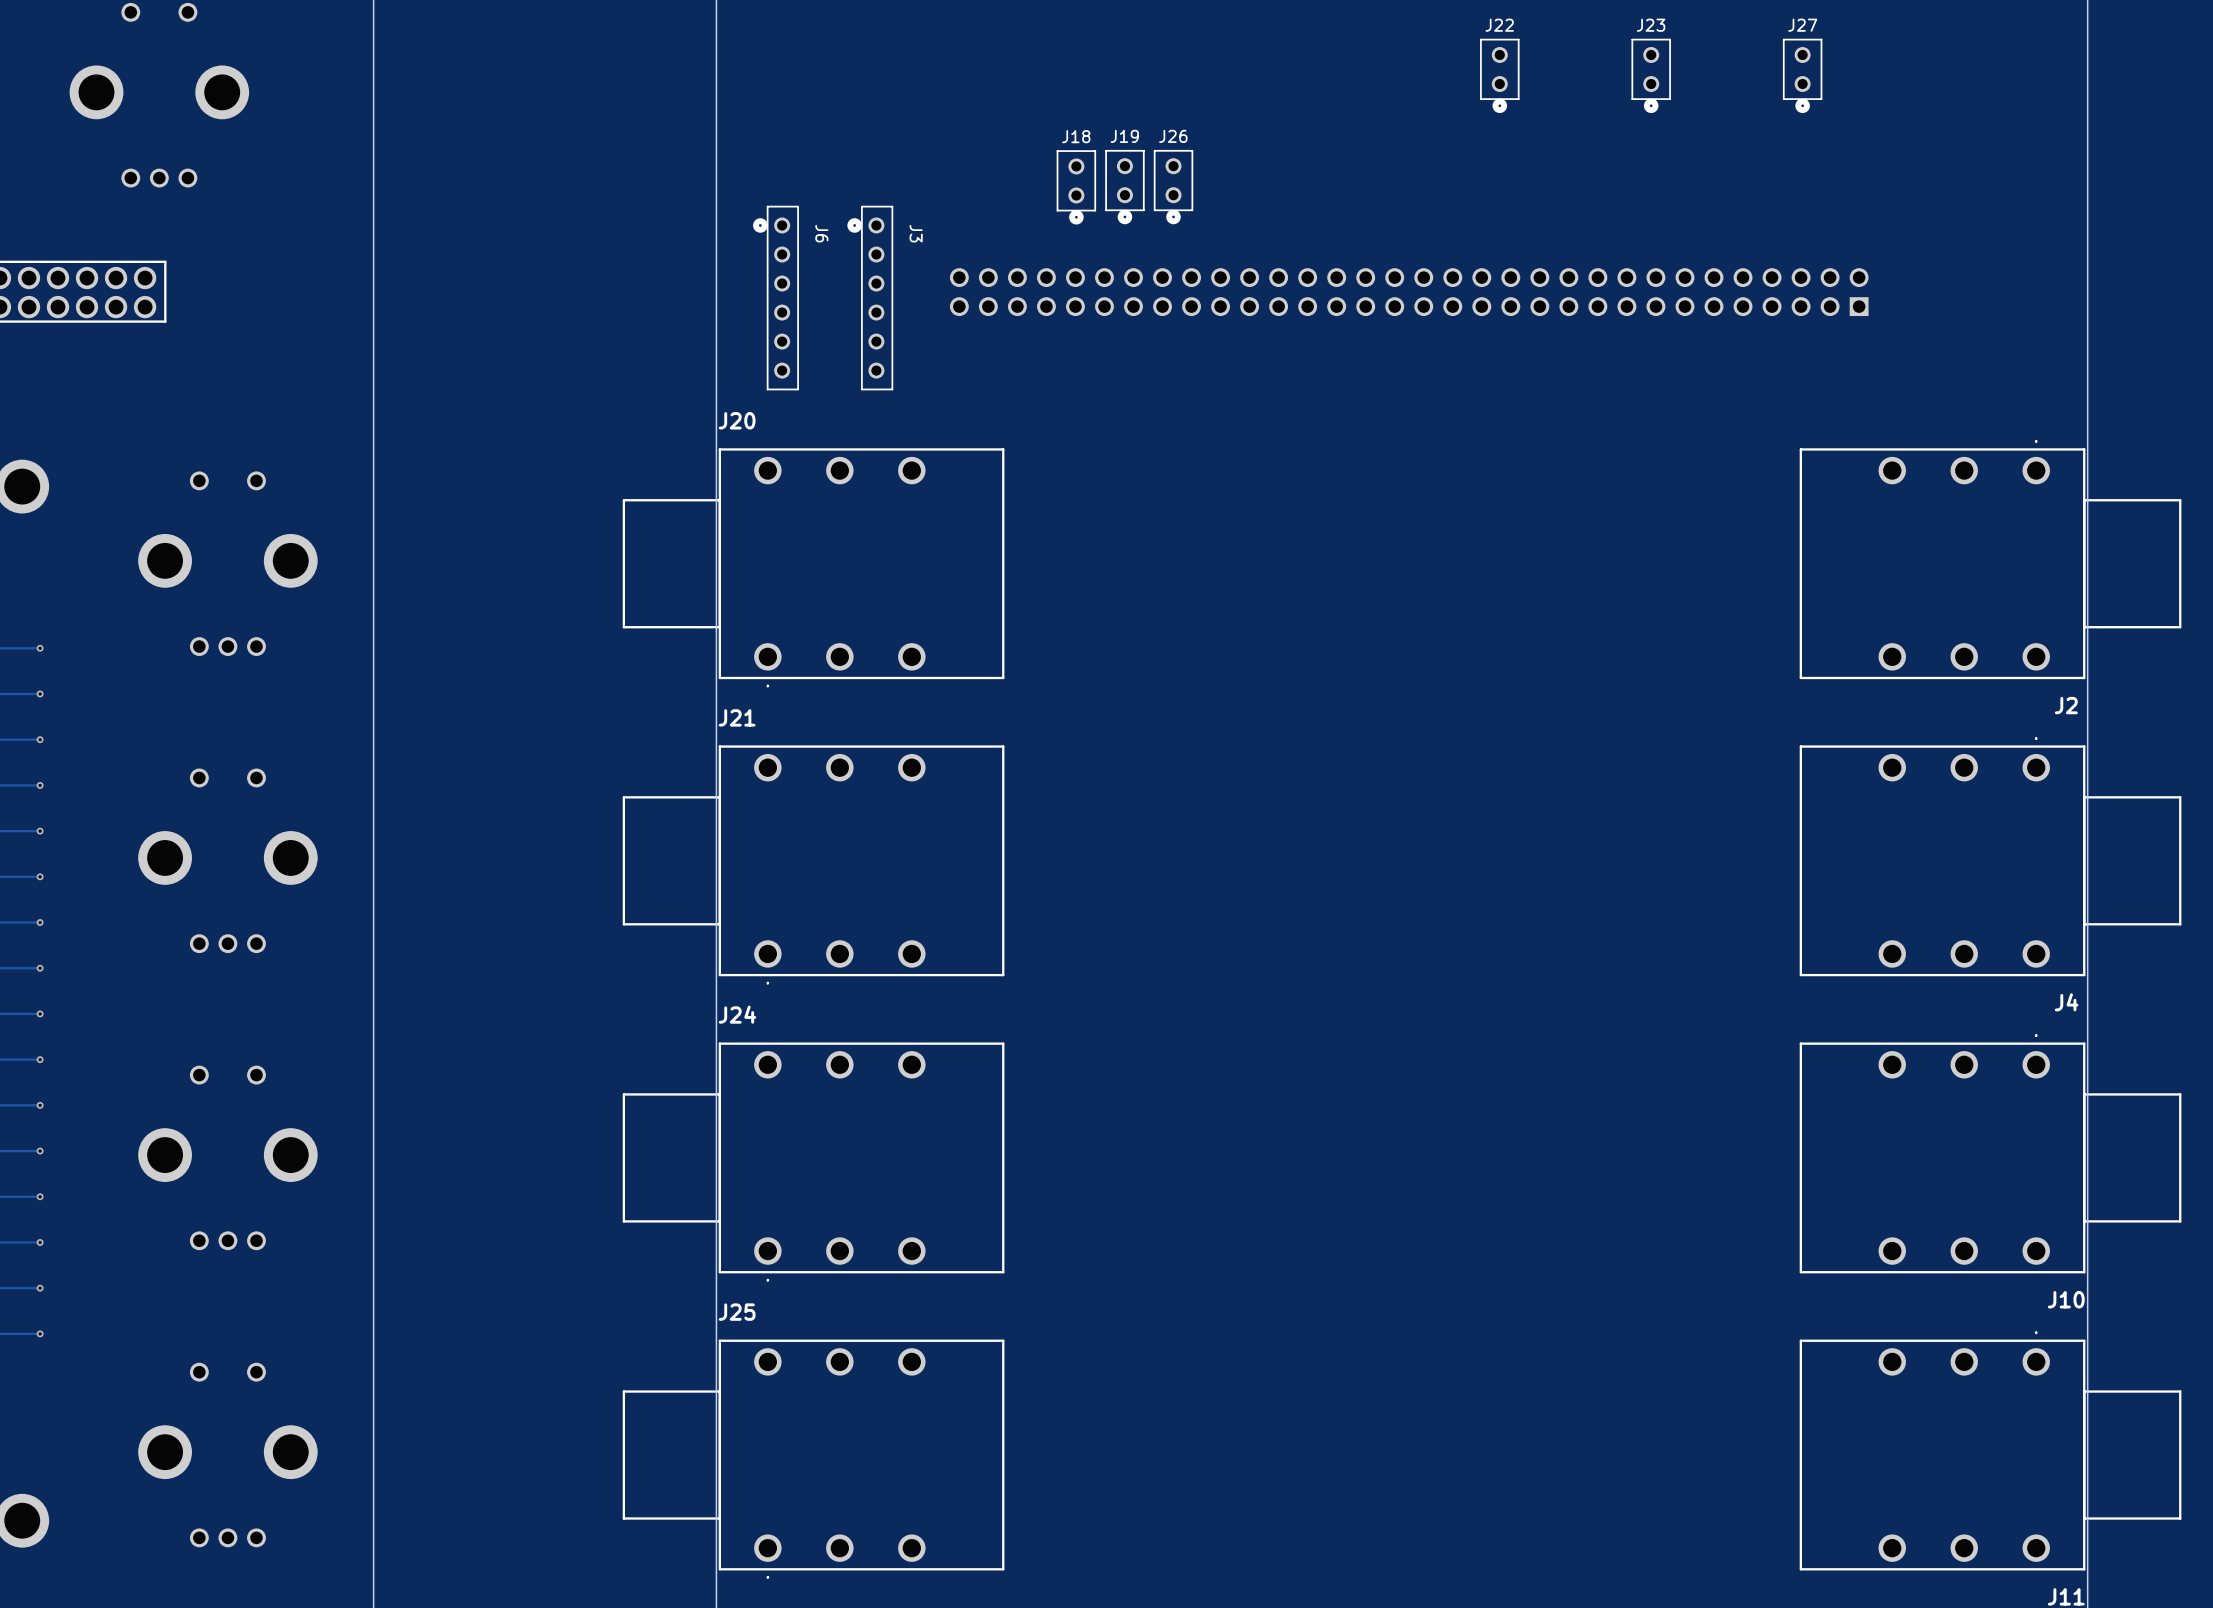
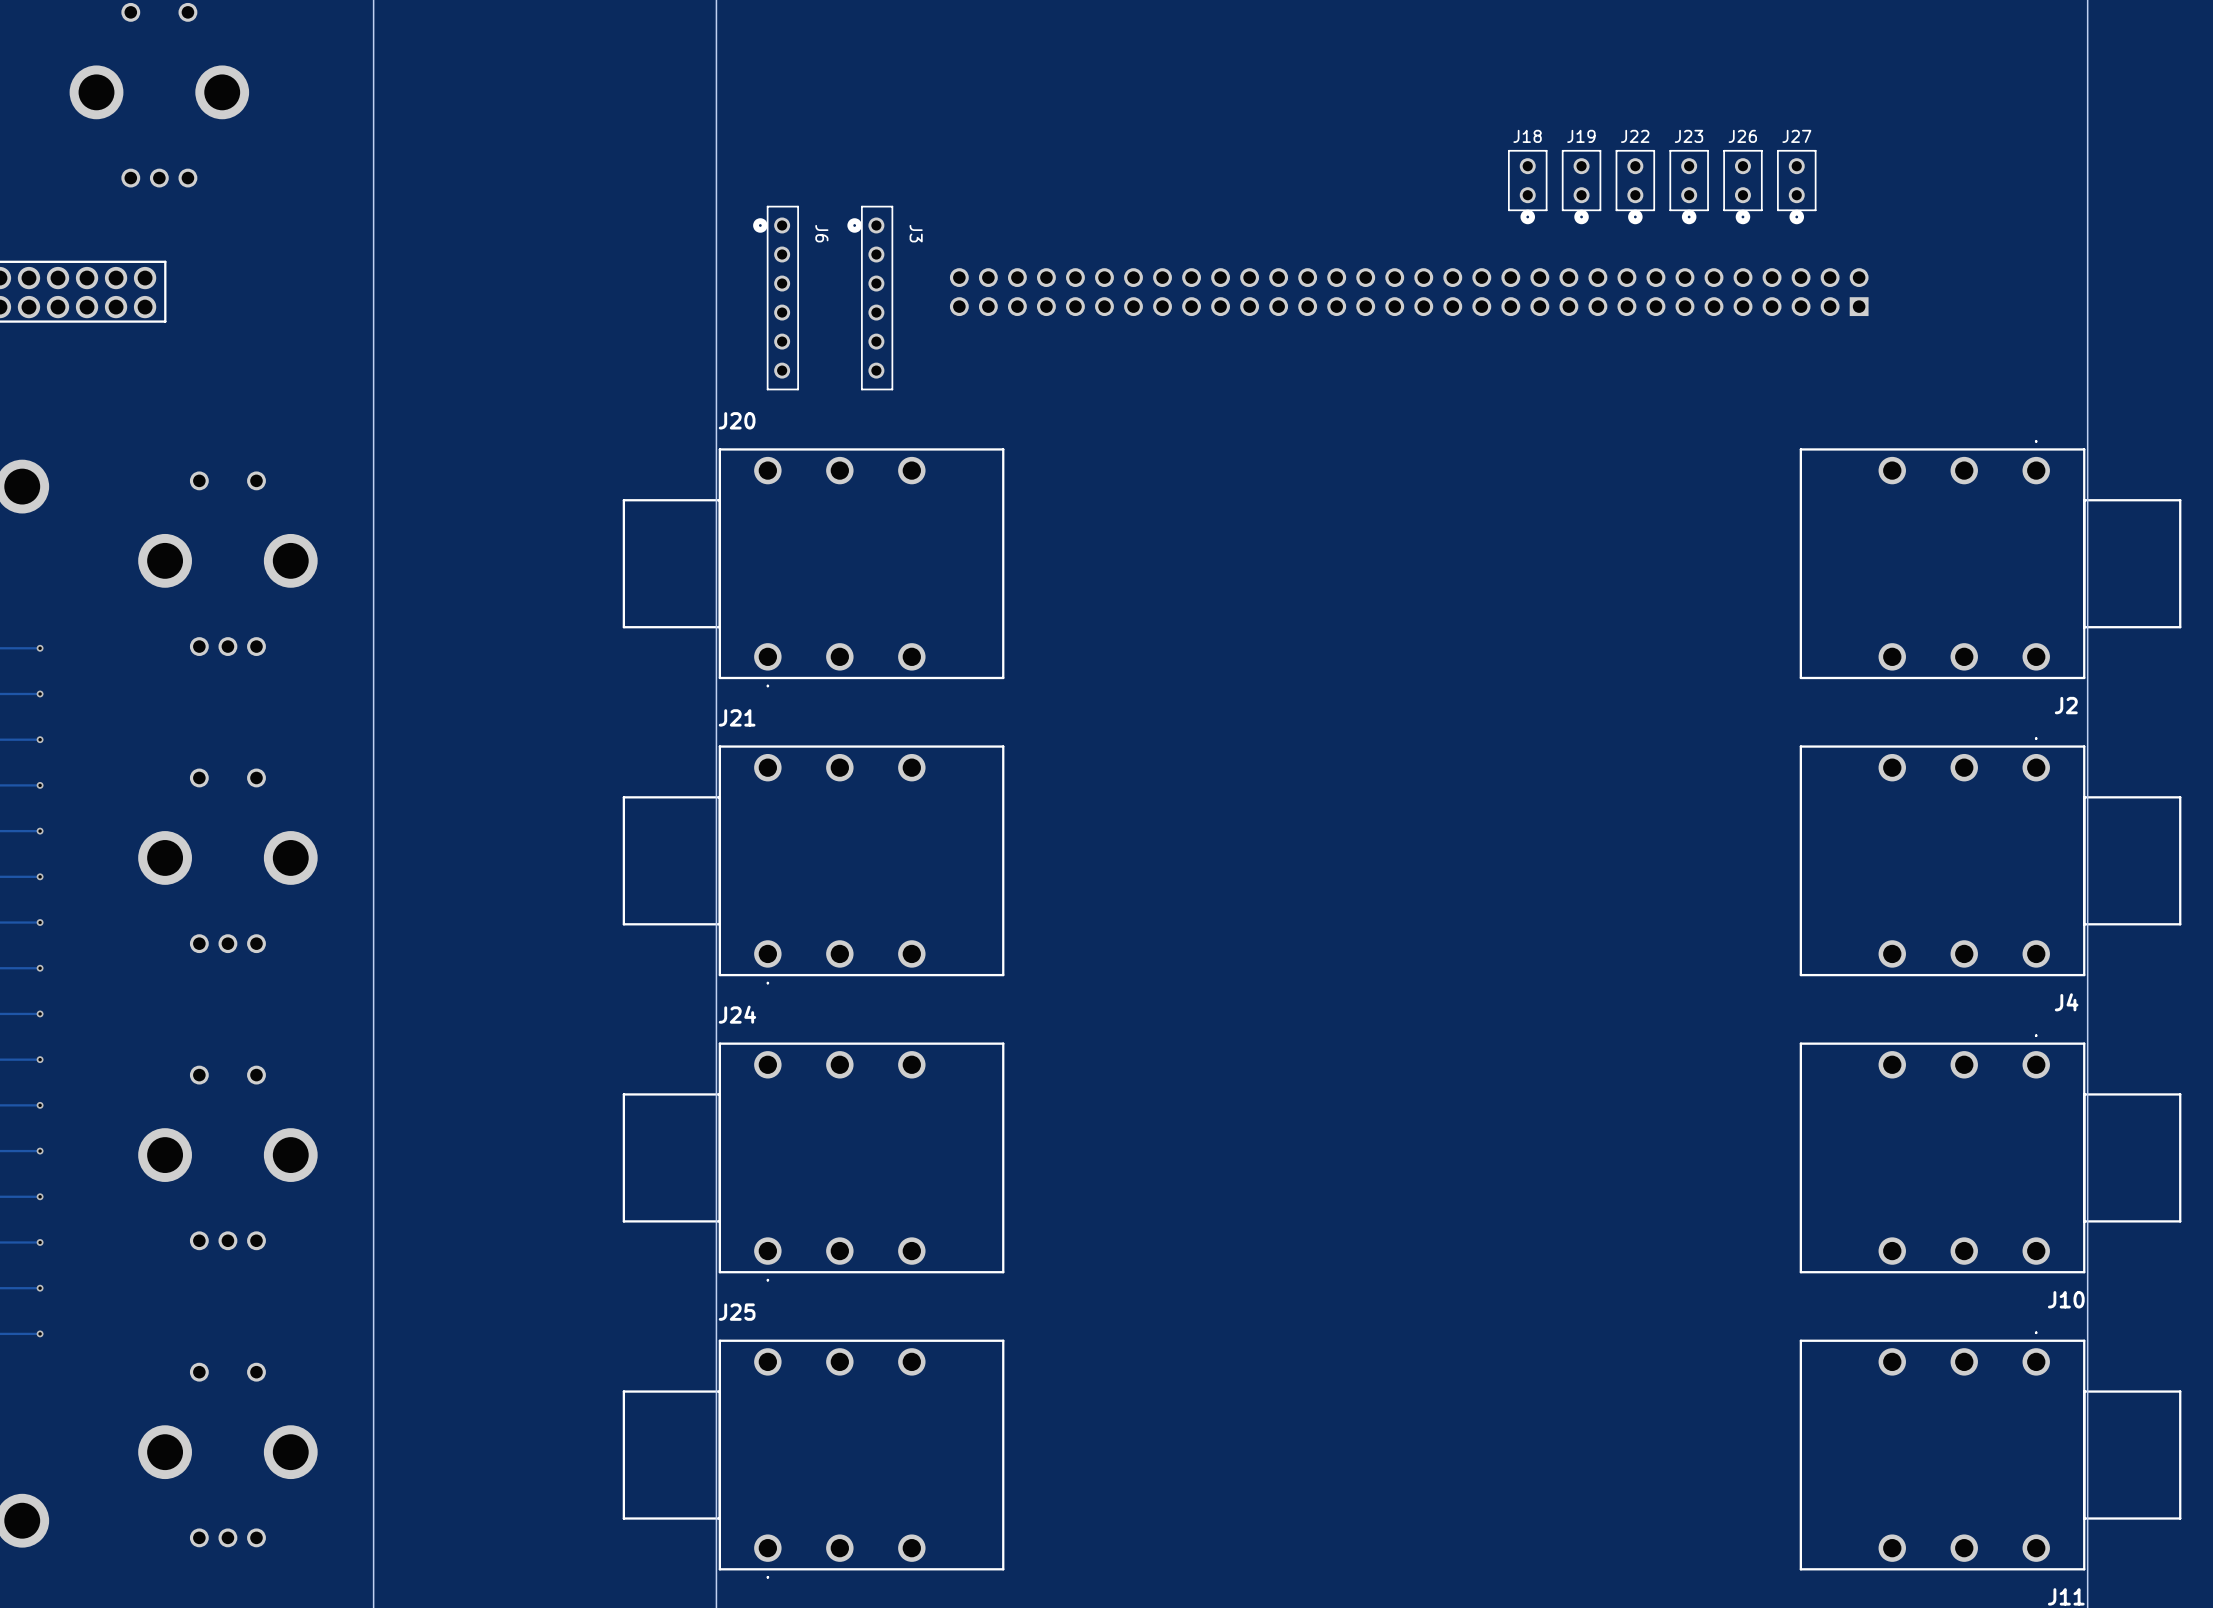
J22 position: (1499, 75) -> (1635, 187)
J23 position: (1651, 75) -> (1689, 187)
J27 position: (1802, 75) -> (1796, 187)
J18 position: (1076, 187) -> (1527, 187)
J19 position: (1124, 187) -> (1581, 187)
J26 position: (1173, 187) -> (1742, 187)

